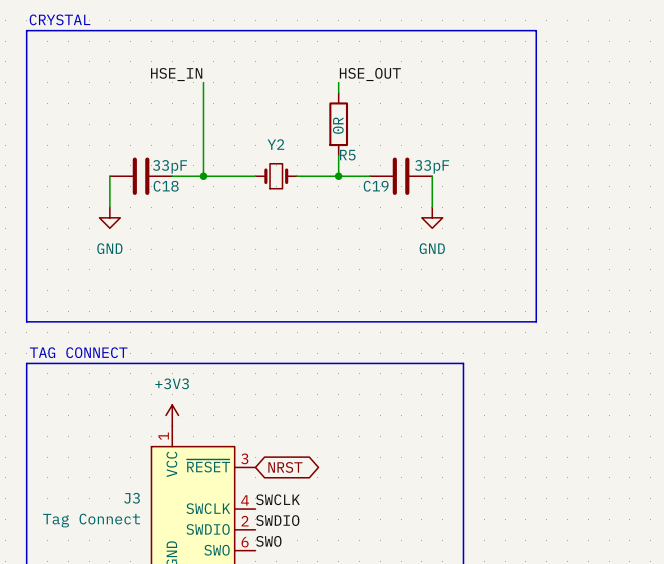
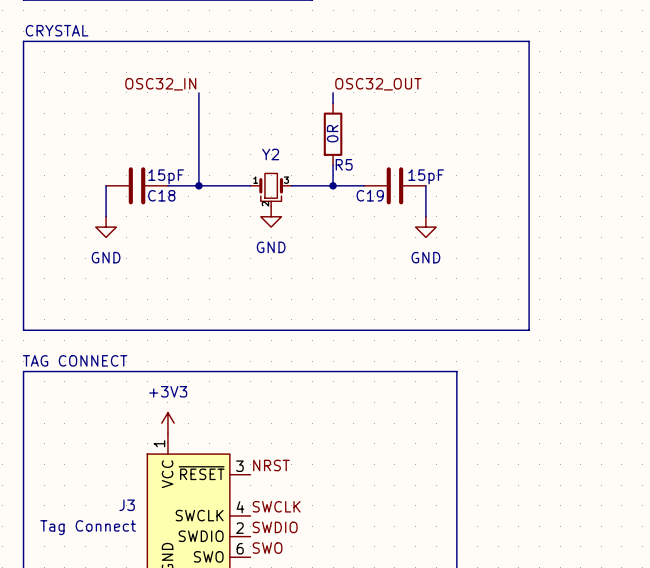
label: HSE_IN (176, 74) -> OSC32_IN (160, 84)
label: HSE_OUT (370, 74) -> OSC32_OUT (378, 84)
Y2 symbol: [255, 163, 298, 189] -> [250, 173, 292, 207]
C18 value: 33pF (170, 166) -> 15pF (166, 176)
C19 value: 33pF (432, 166) -> 15pF (426, 176)
power symbol: none -> GND (271, 216)
label: none -> NRST (271, 465)
global label: NRST (285, 467) -> none

